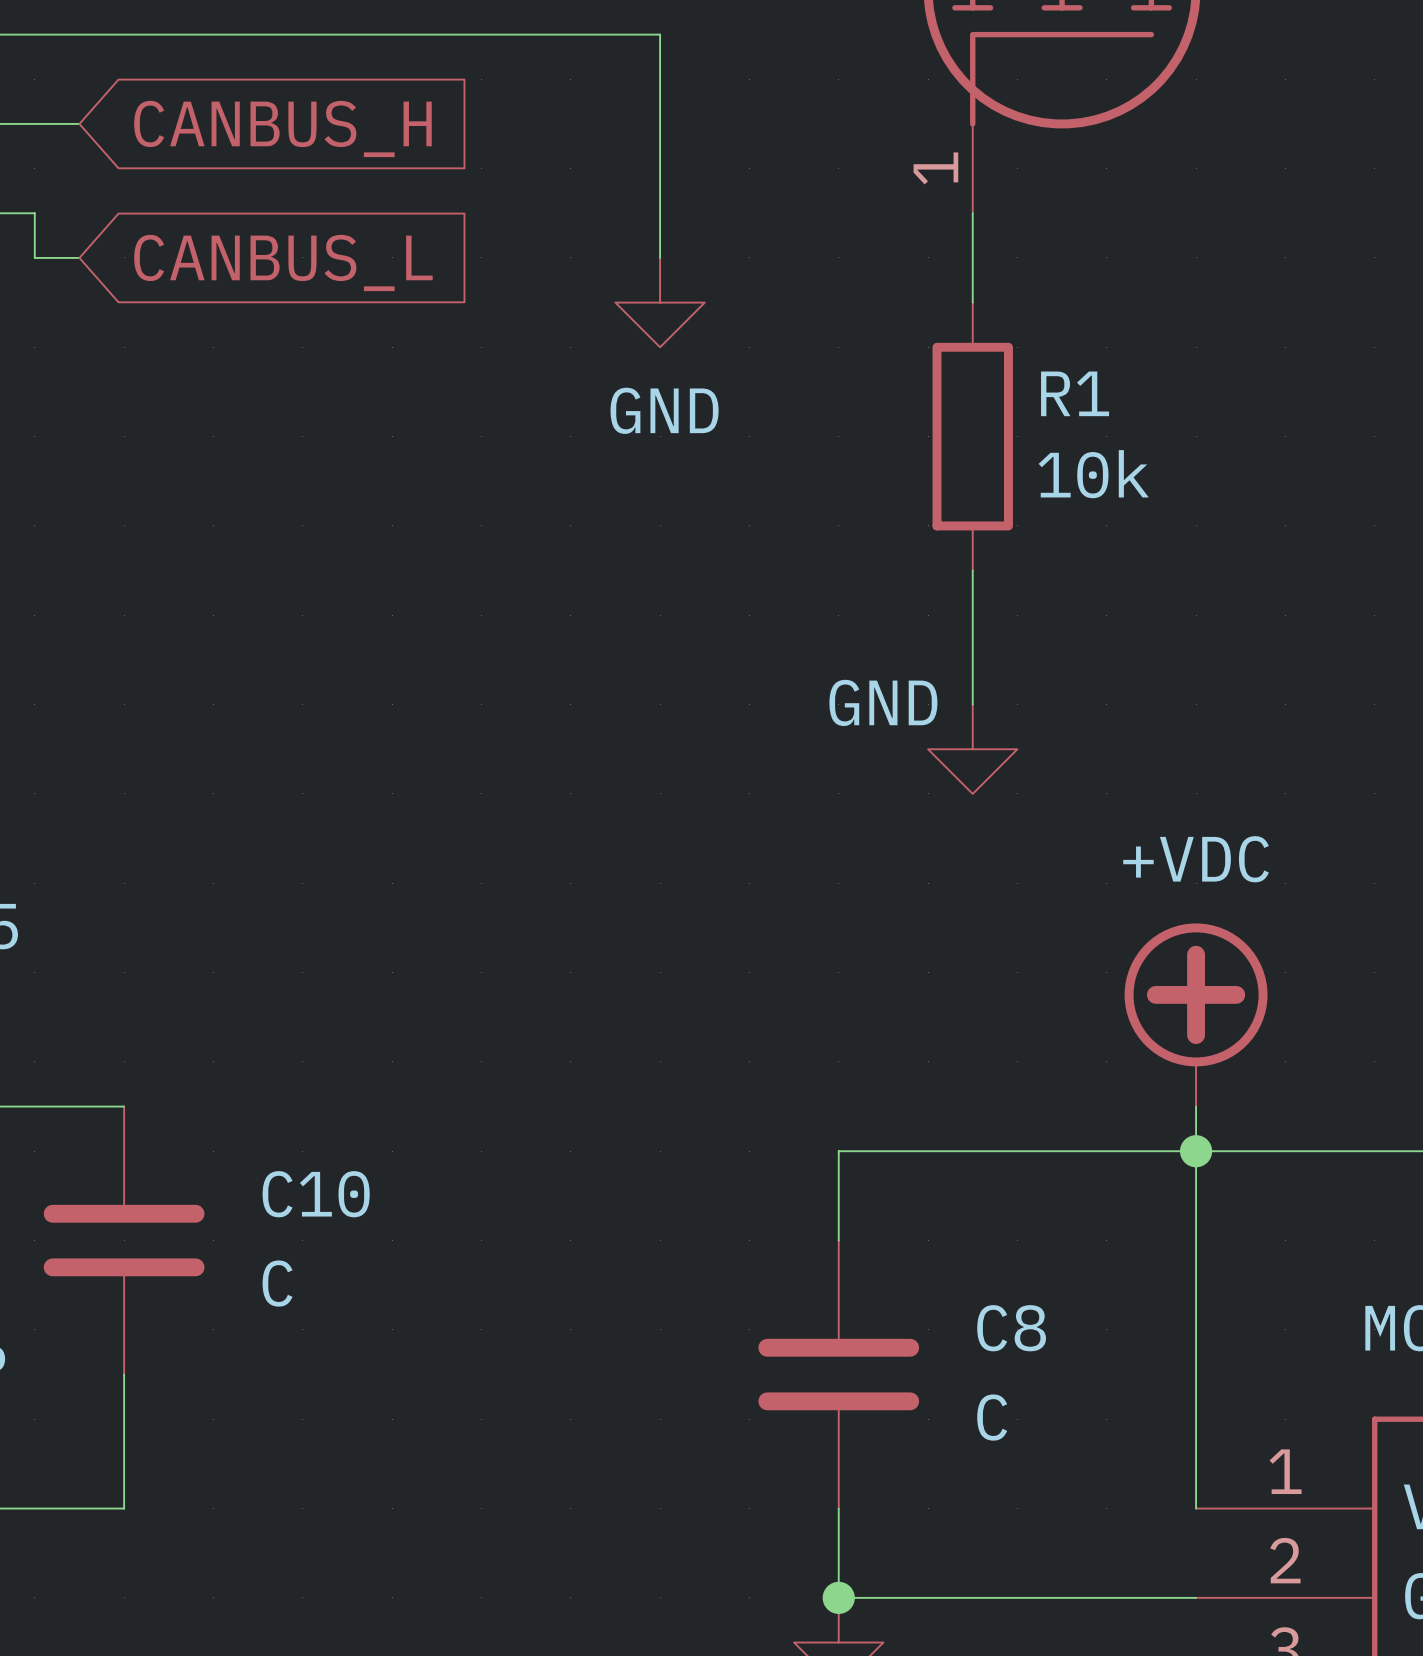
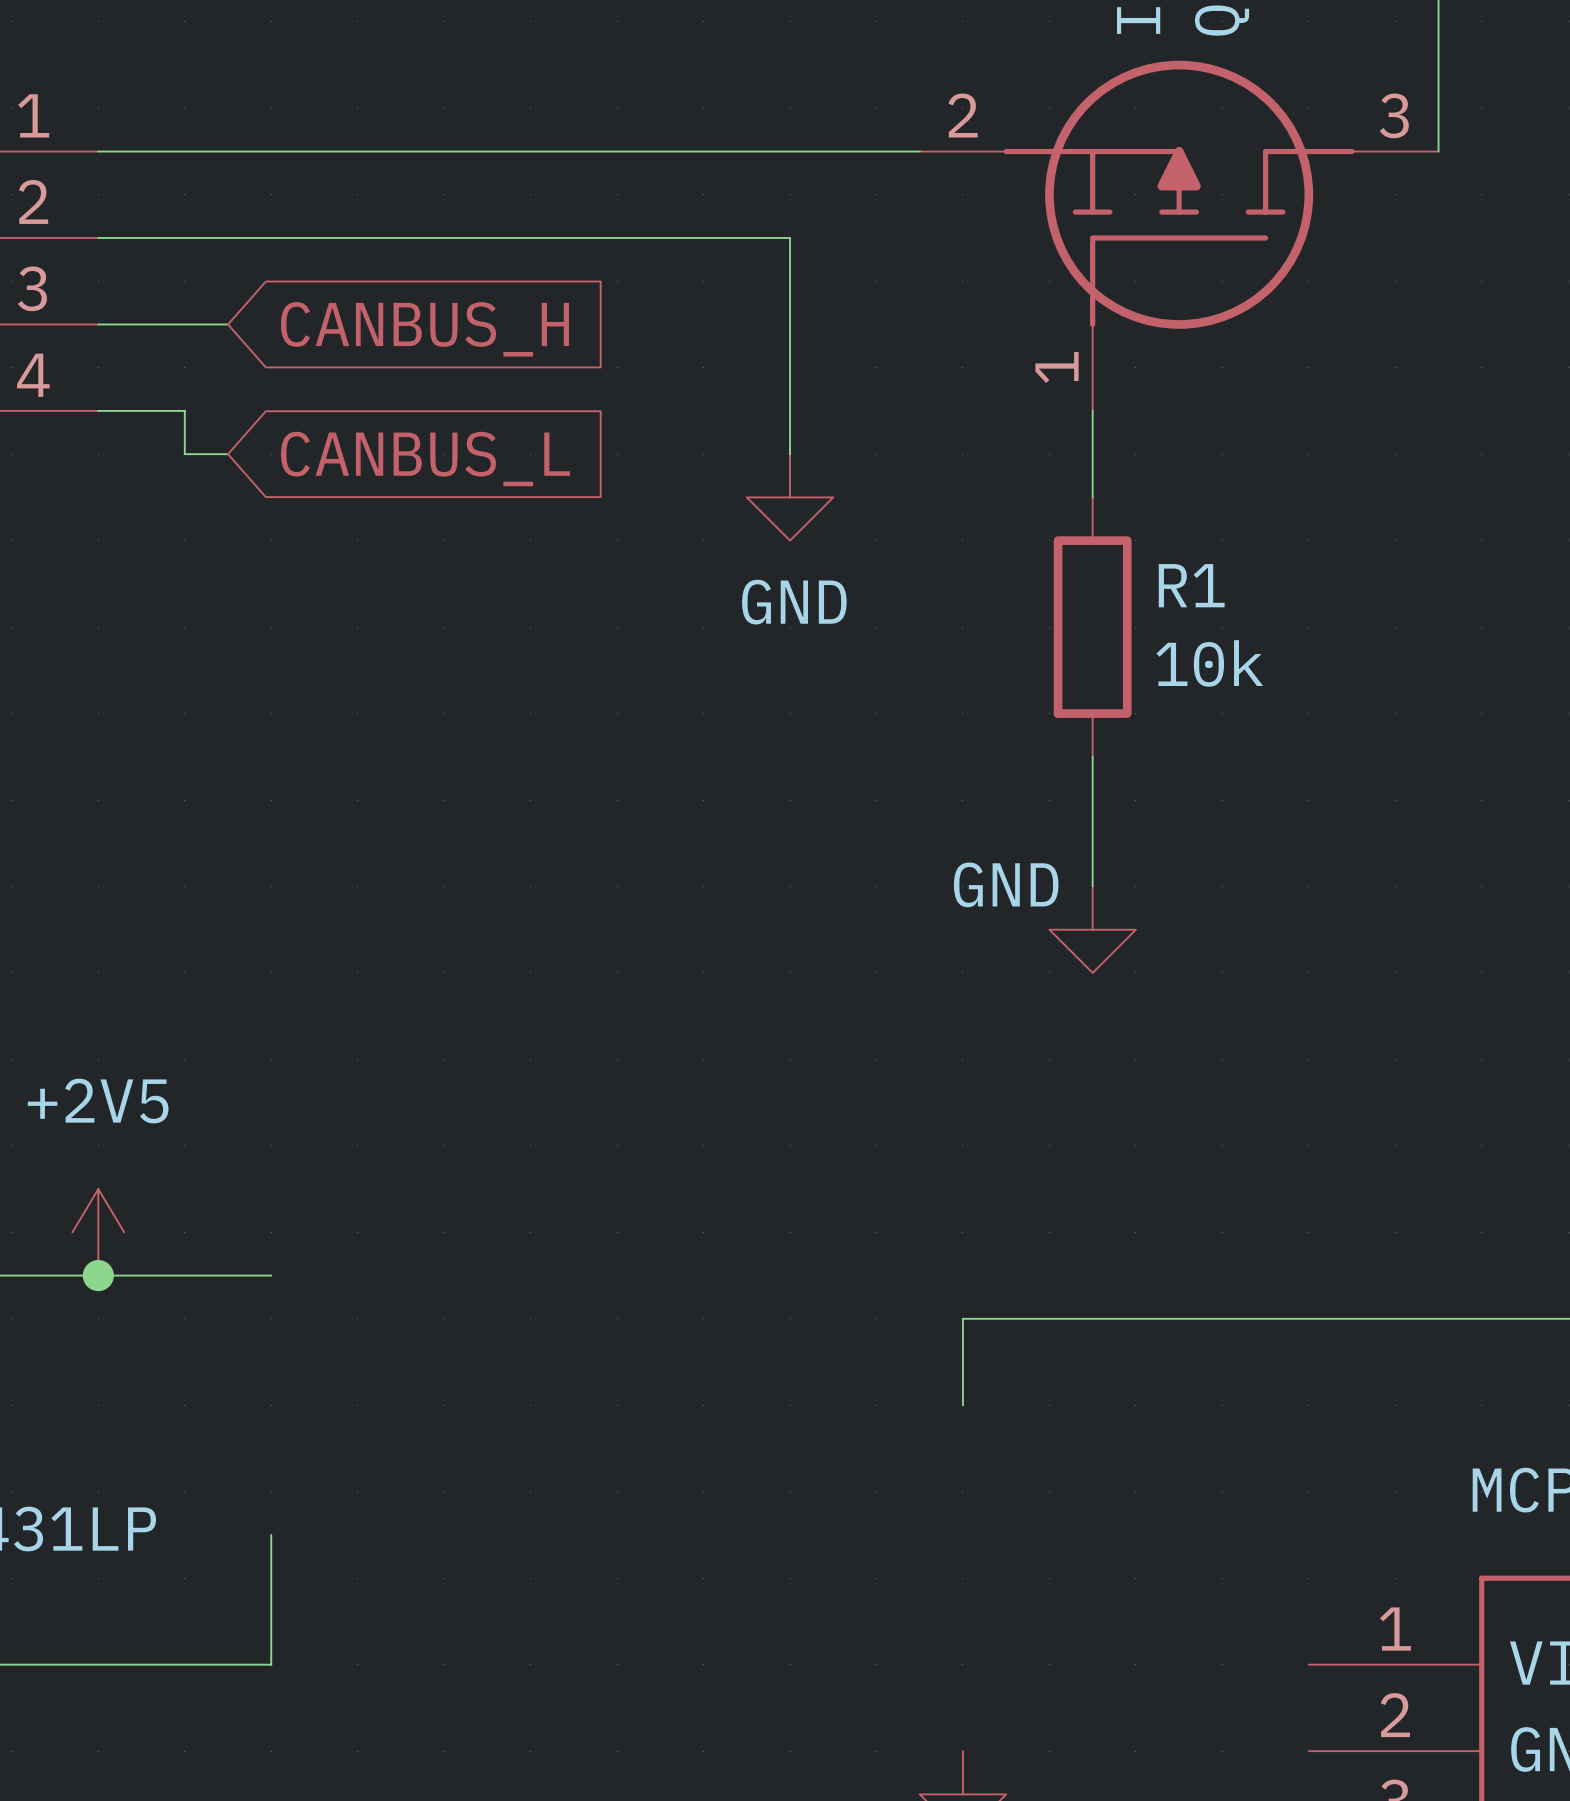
power symbol: +VDC (1196, 1015) -> none
wire: (1196, 1106) (1196, 1508) -> none
junction: (1196, 1151) -> none
C10: C (124, 1240) -> none
C8: C (838, 1374) -> none
wire: (838, 1508) (838, 1597) (1196, 1597) -> none
junction: (838, 1597) -> none

